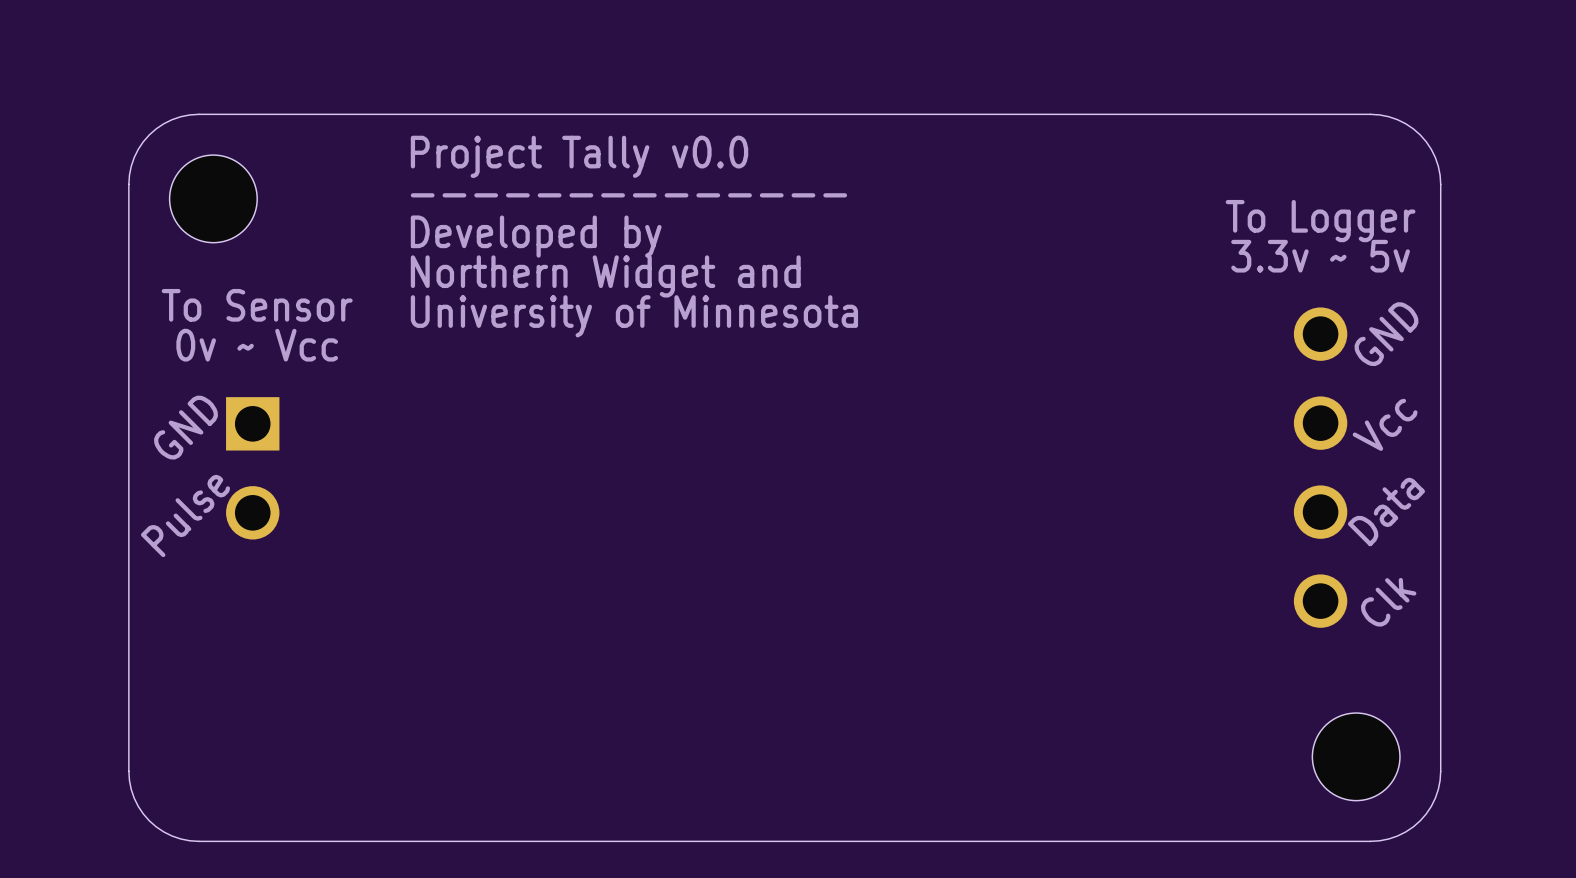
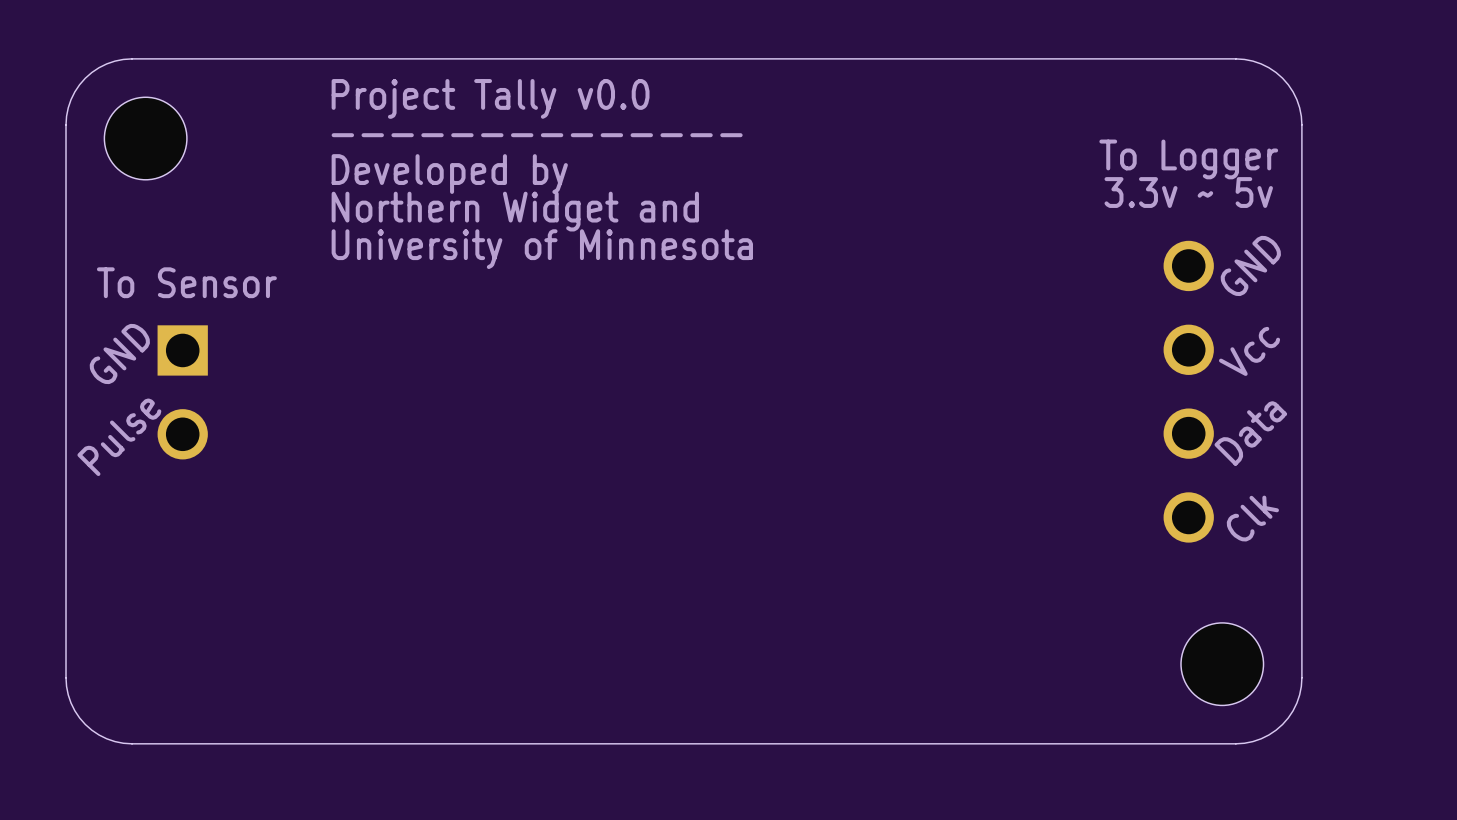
text: To Sensor (257, 305) -> none
text: 0v ~ Vcc (257, 345) -> To Sensor (186, 282)

